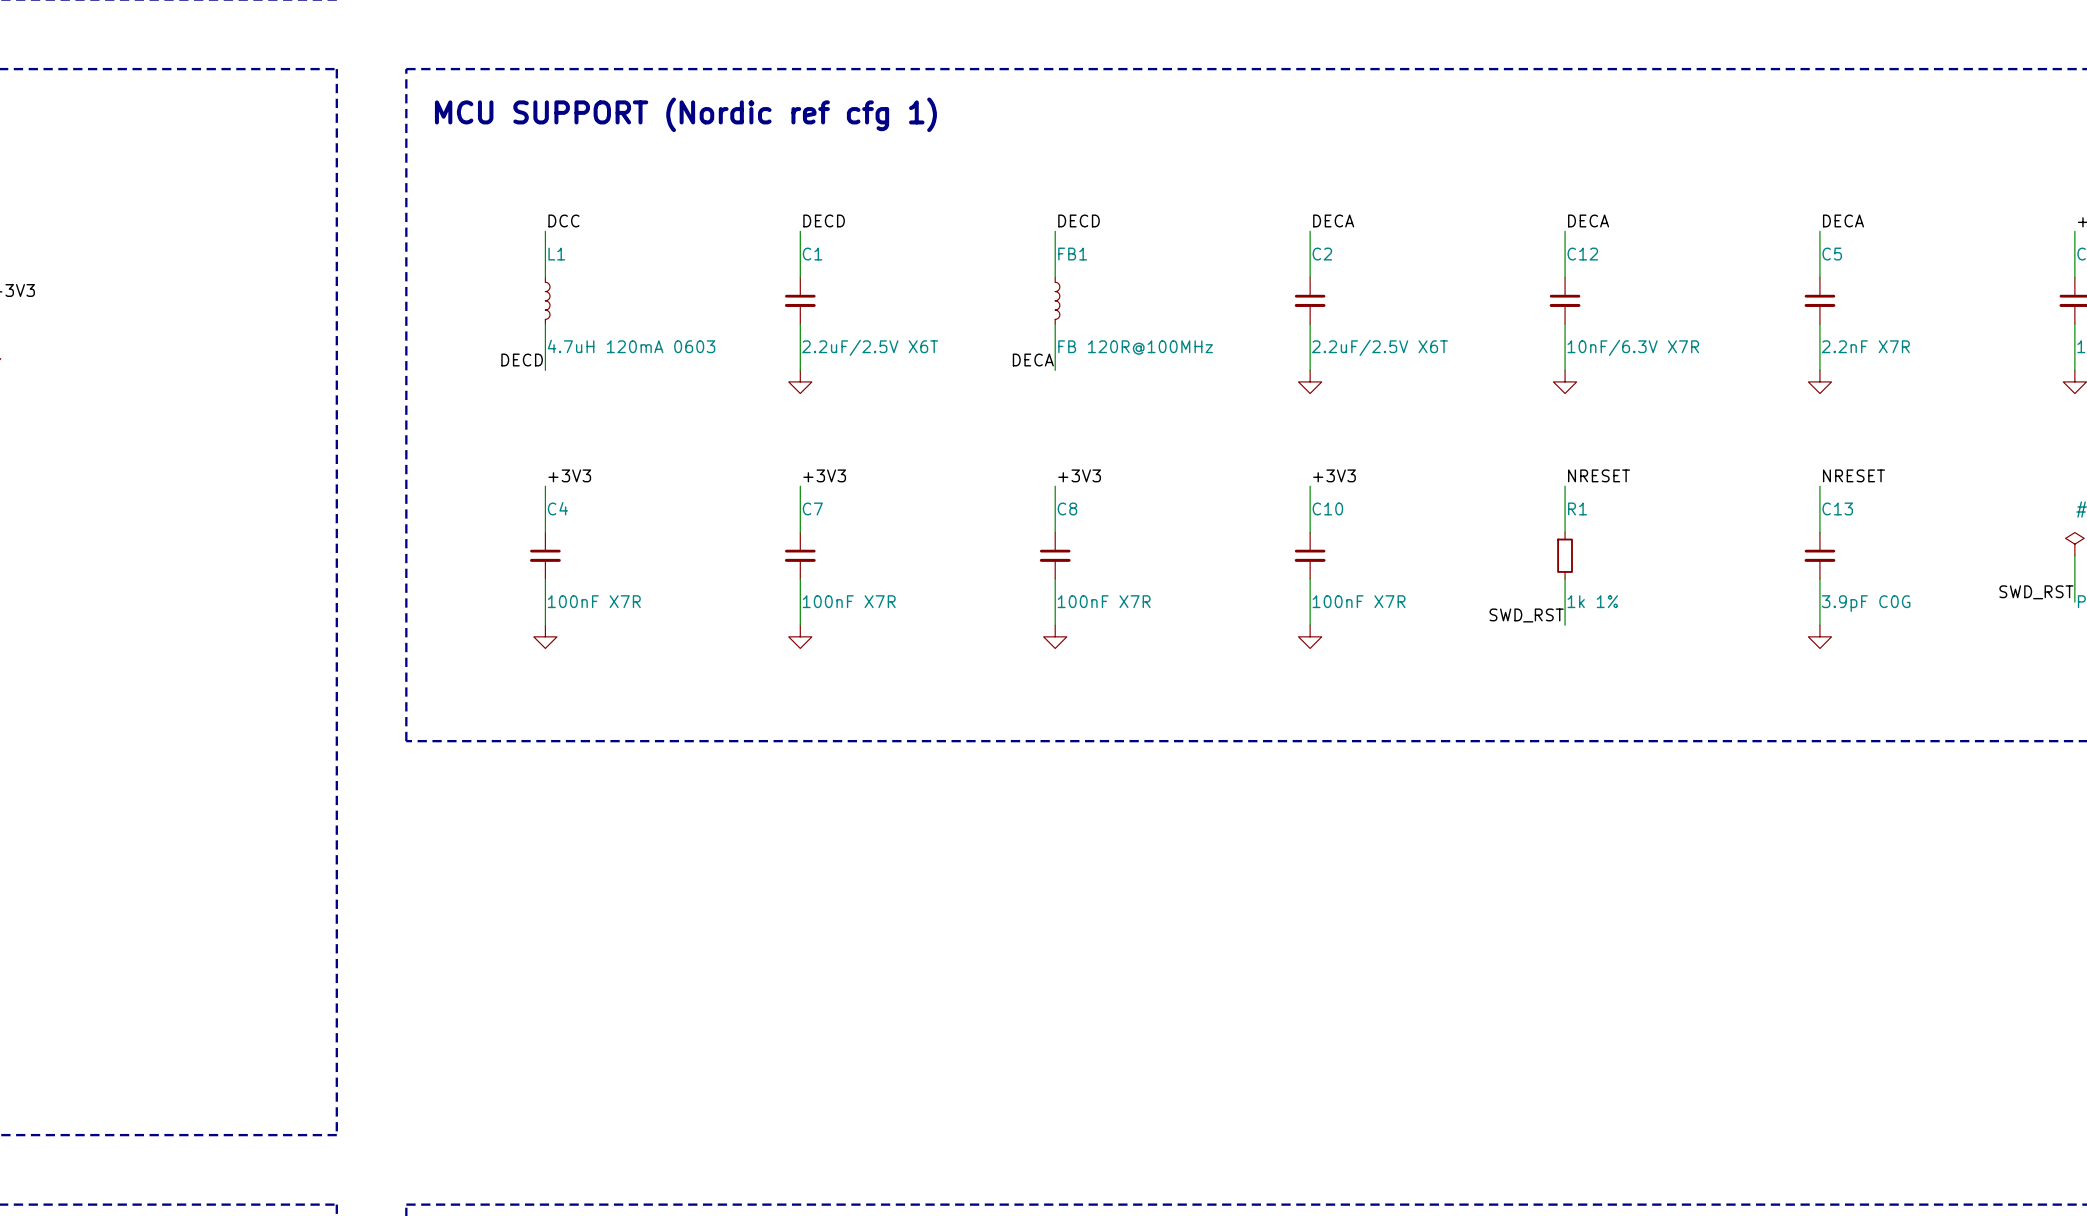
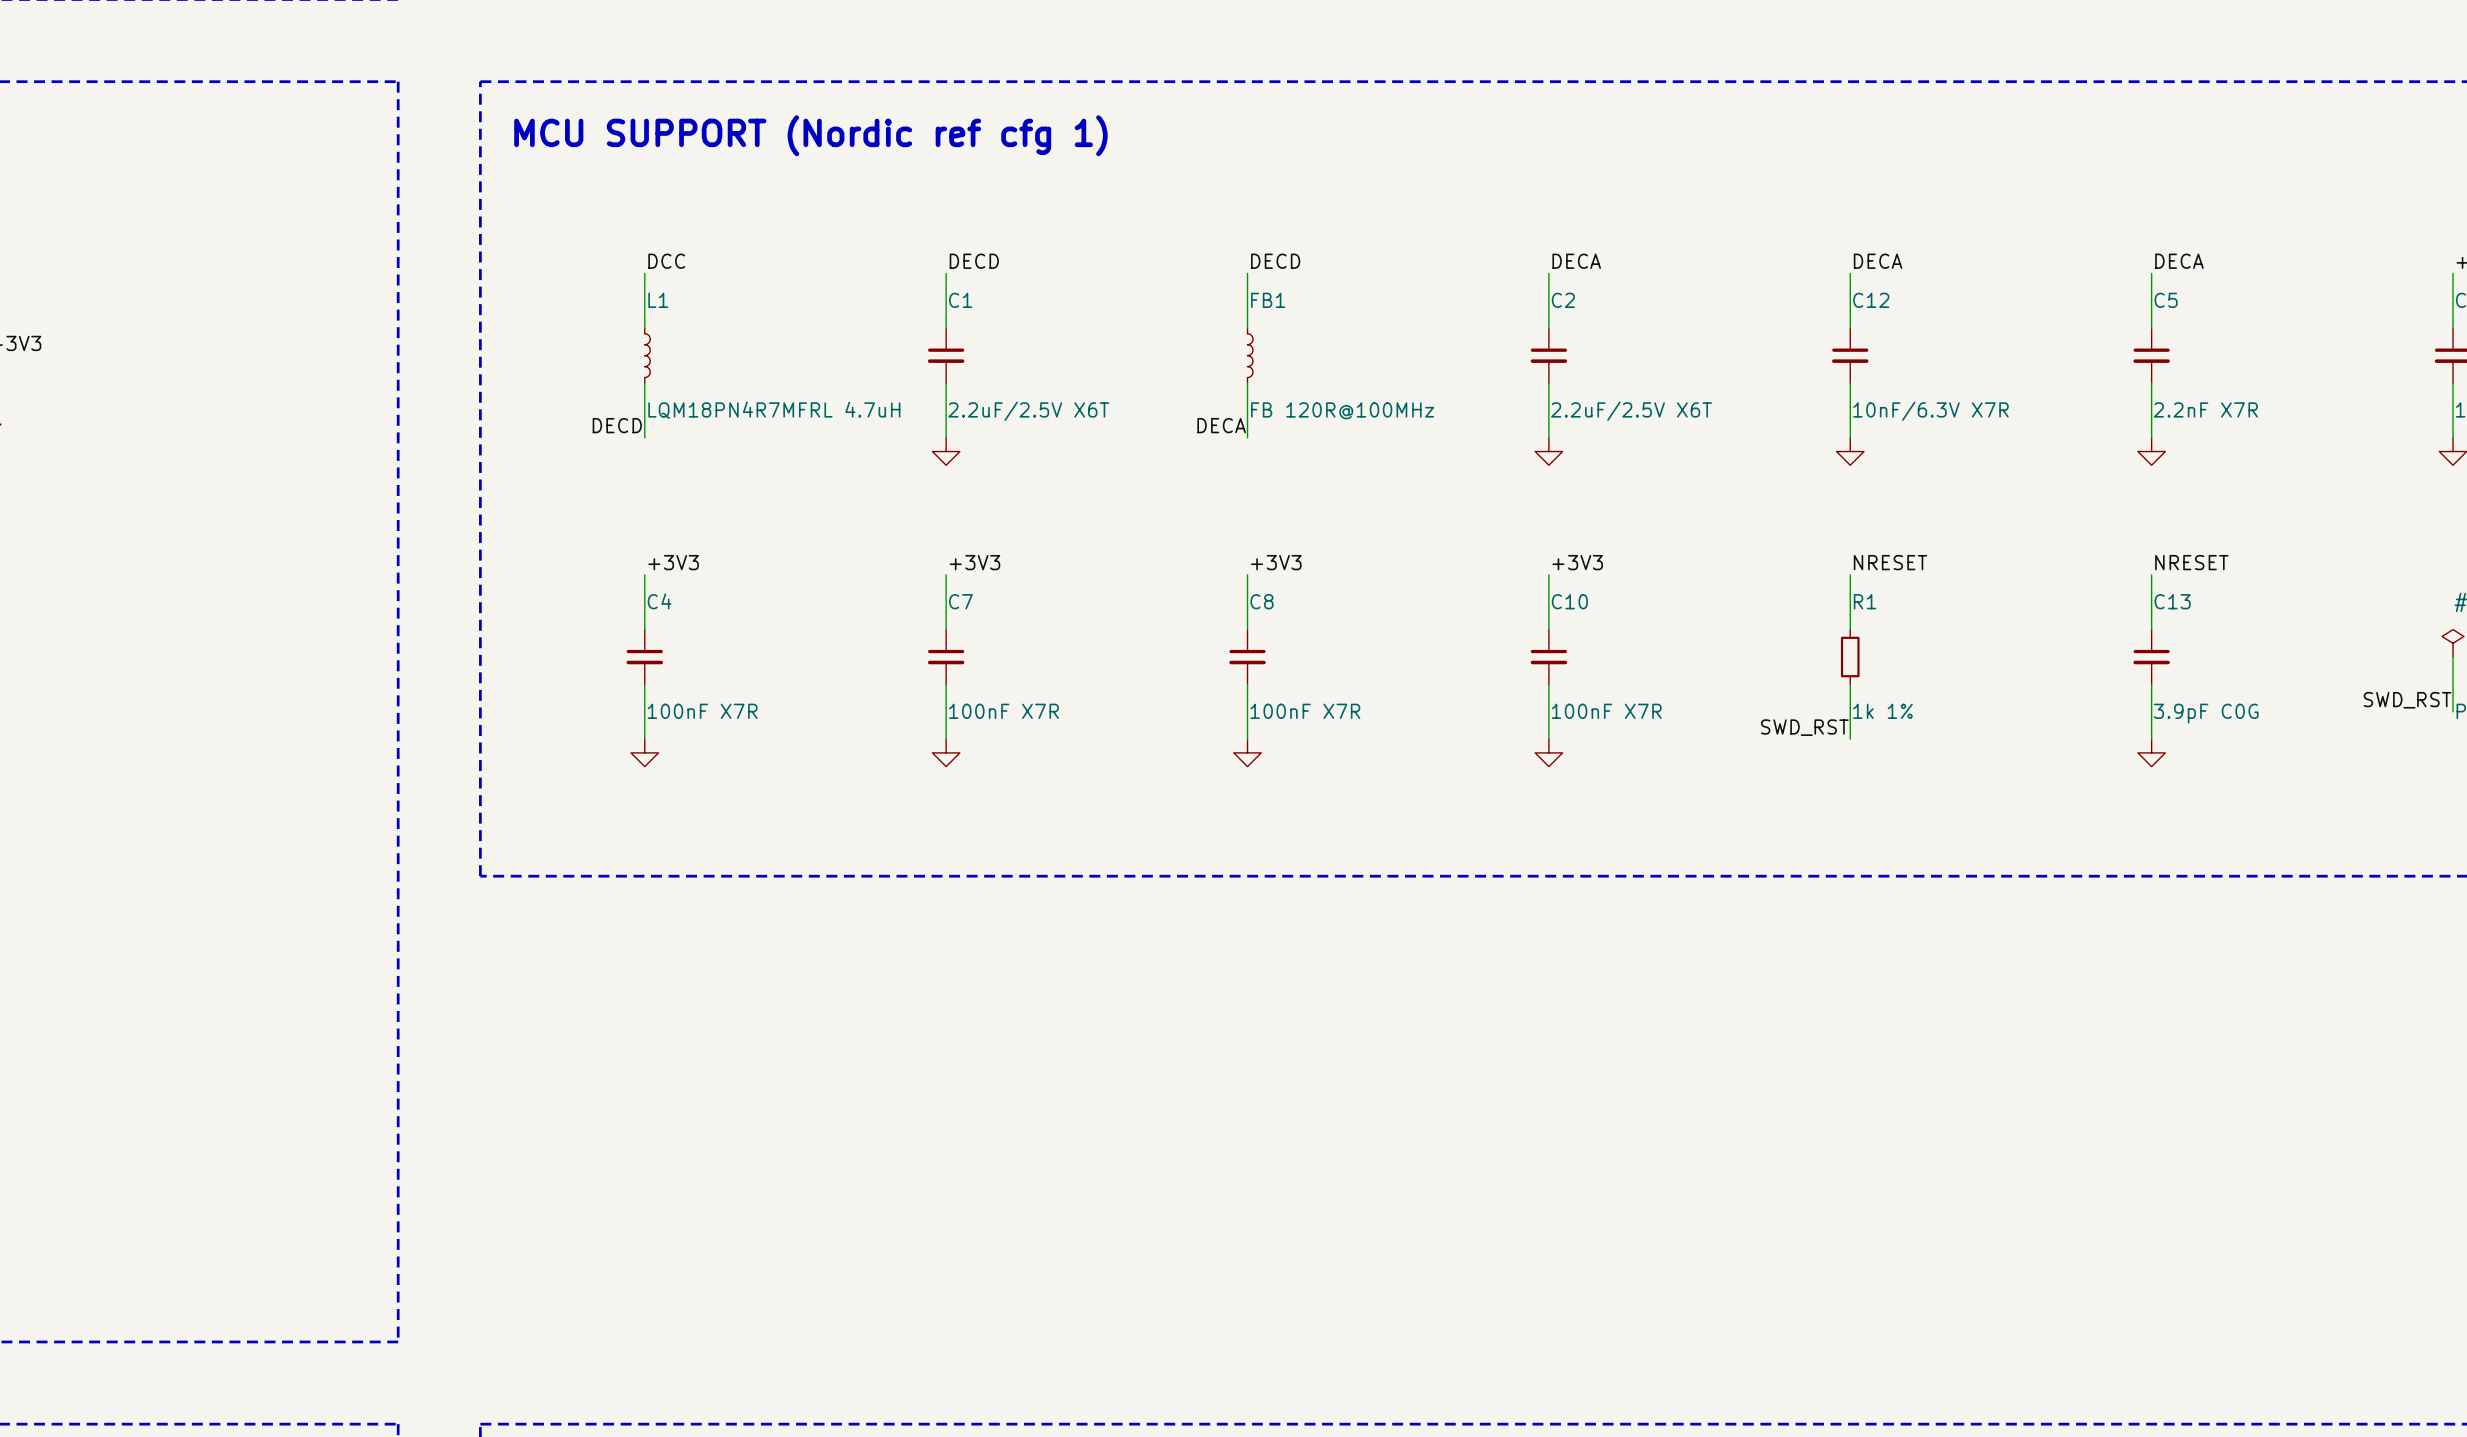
L1 value: 4.7uH 120mA 0603 (631, 346) -> LQM18PN4R7MFRL 4.7uH (774, 410)

